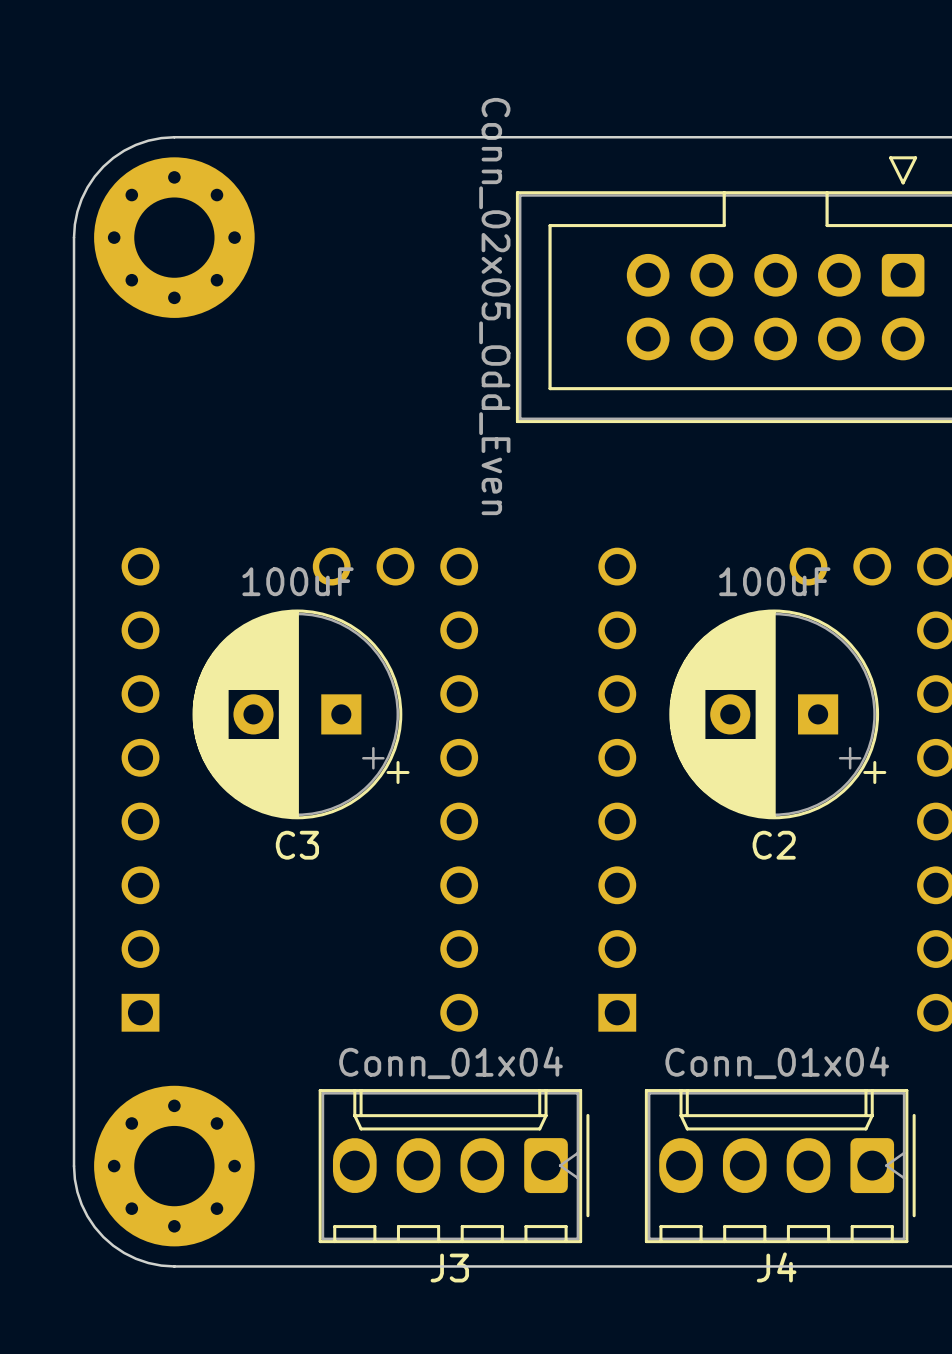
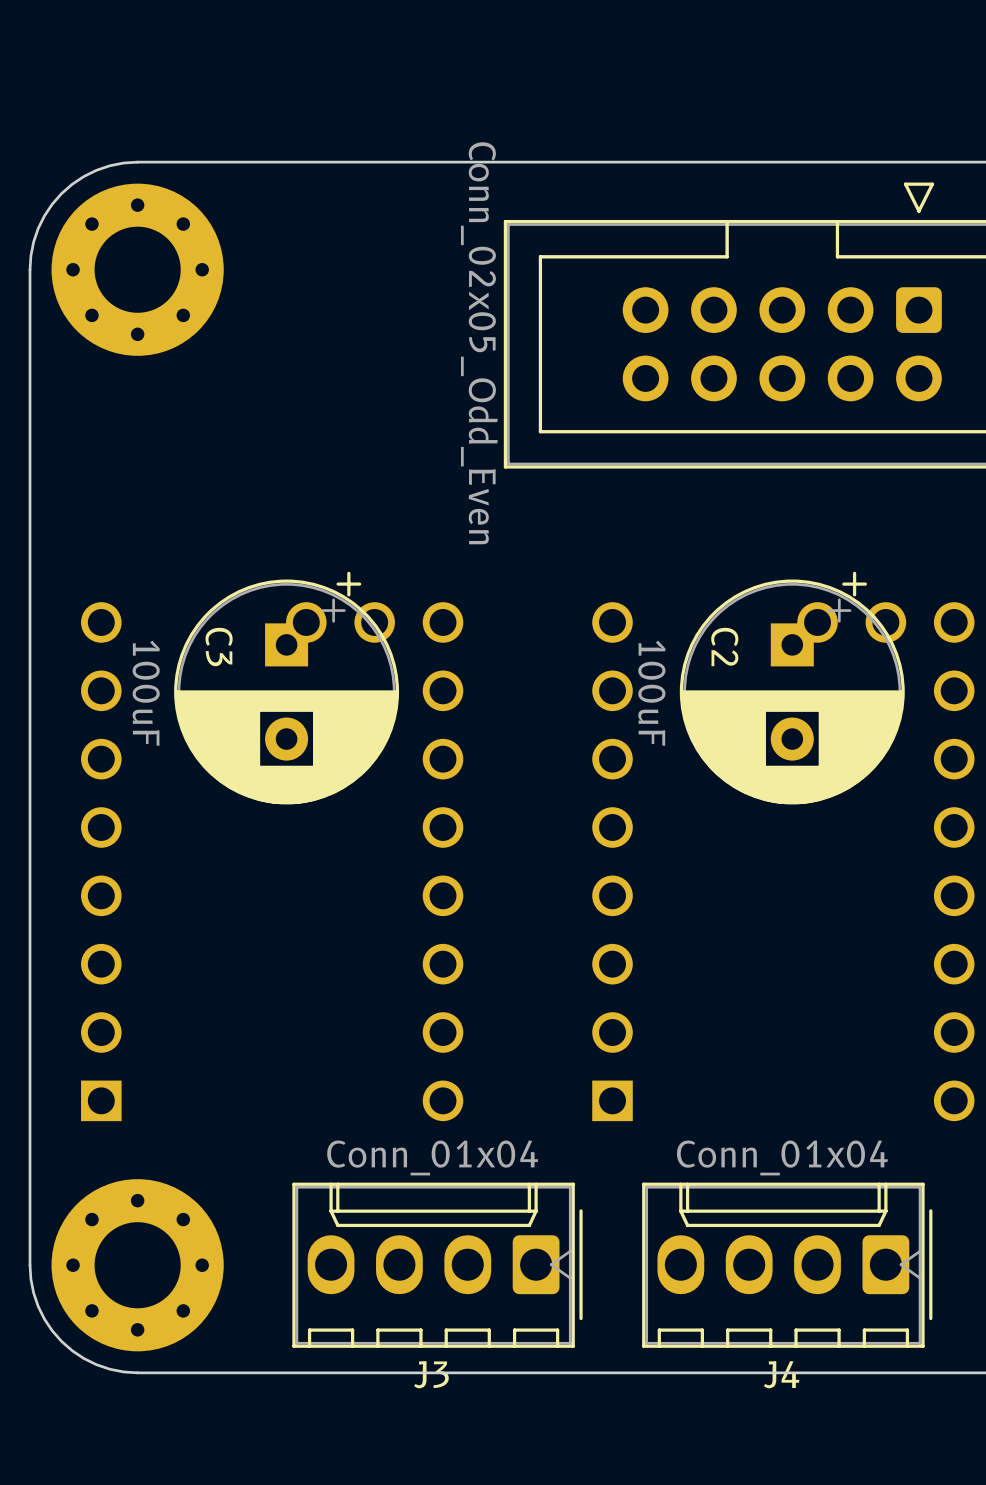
C3 rotation: 0° (301, 714) -> 90° counterclockwise (286, 688)
C2 rotation: 0° (777, 714) -> 90° counterclockwise (792, 688)
C3 name position: C3 (297, 845) -> C3 (219, 647)
C2 name position: C2 (774, 845) -> C2 (724, 646)

